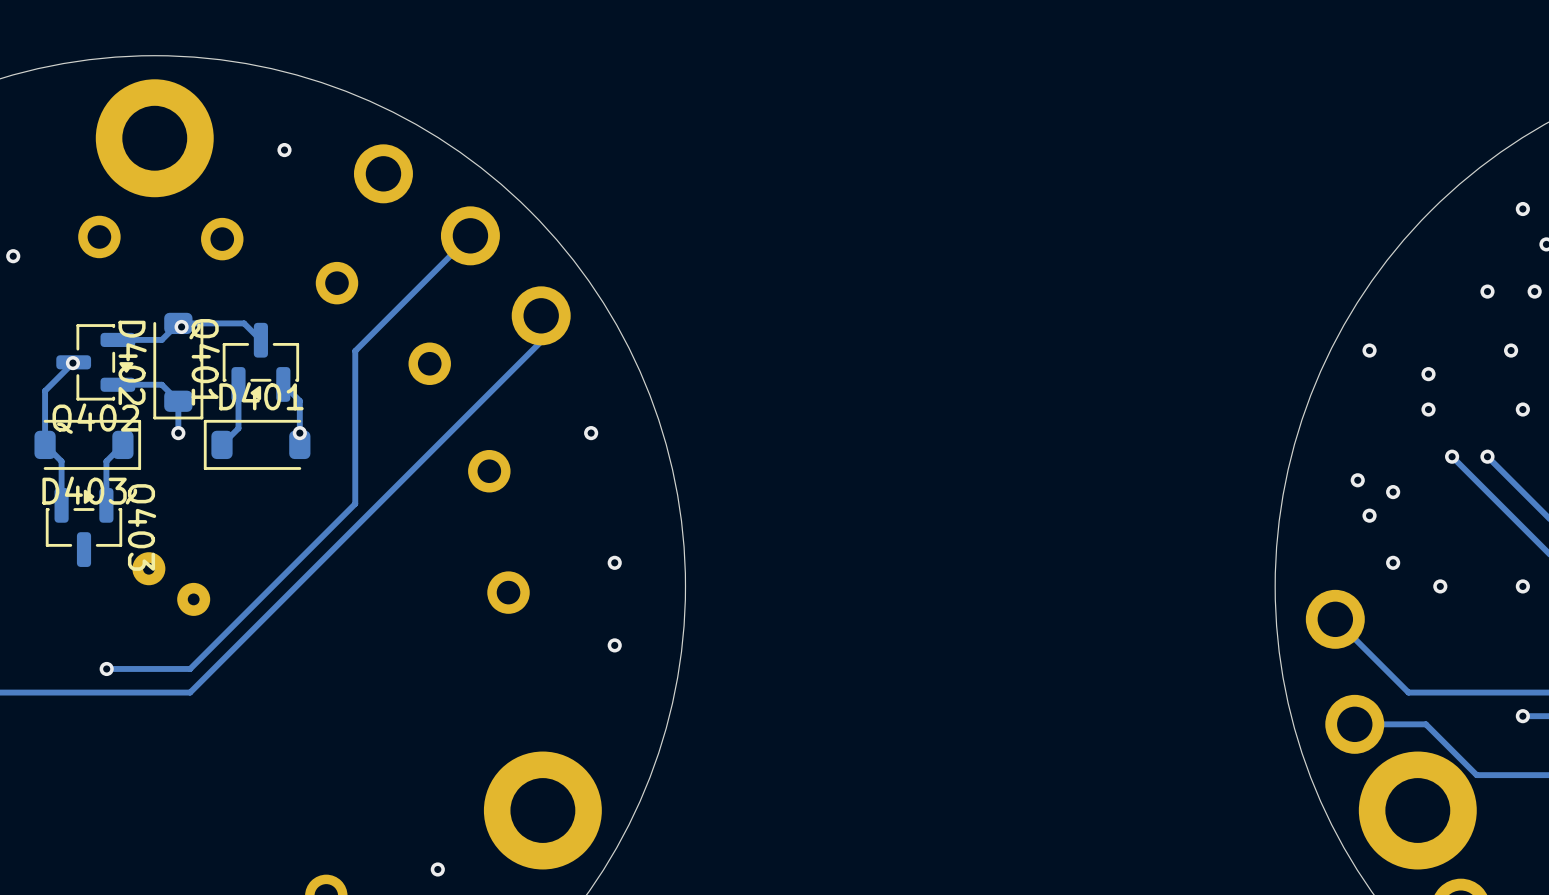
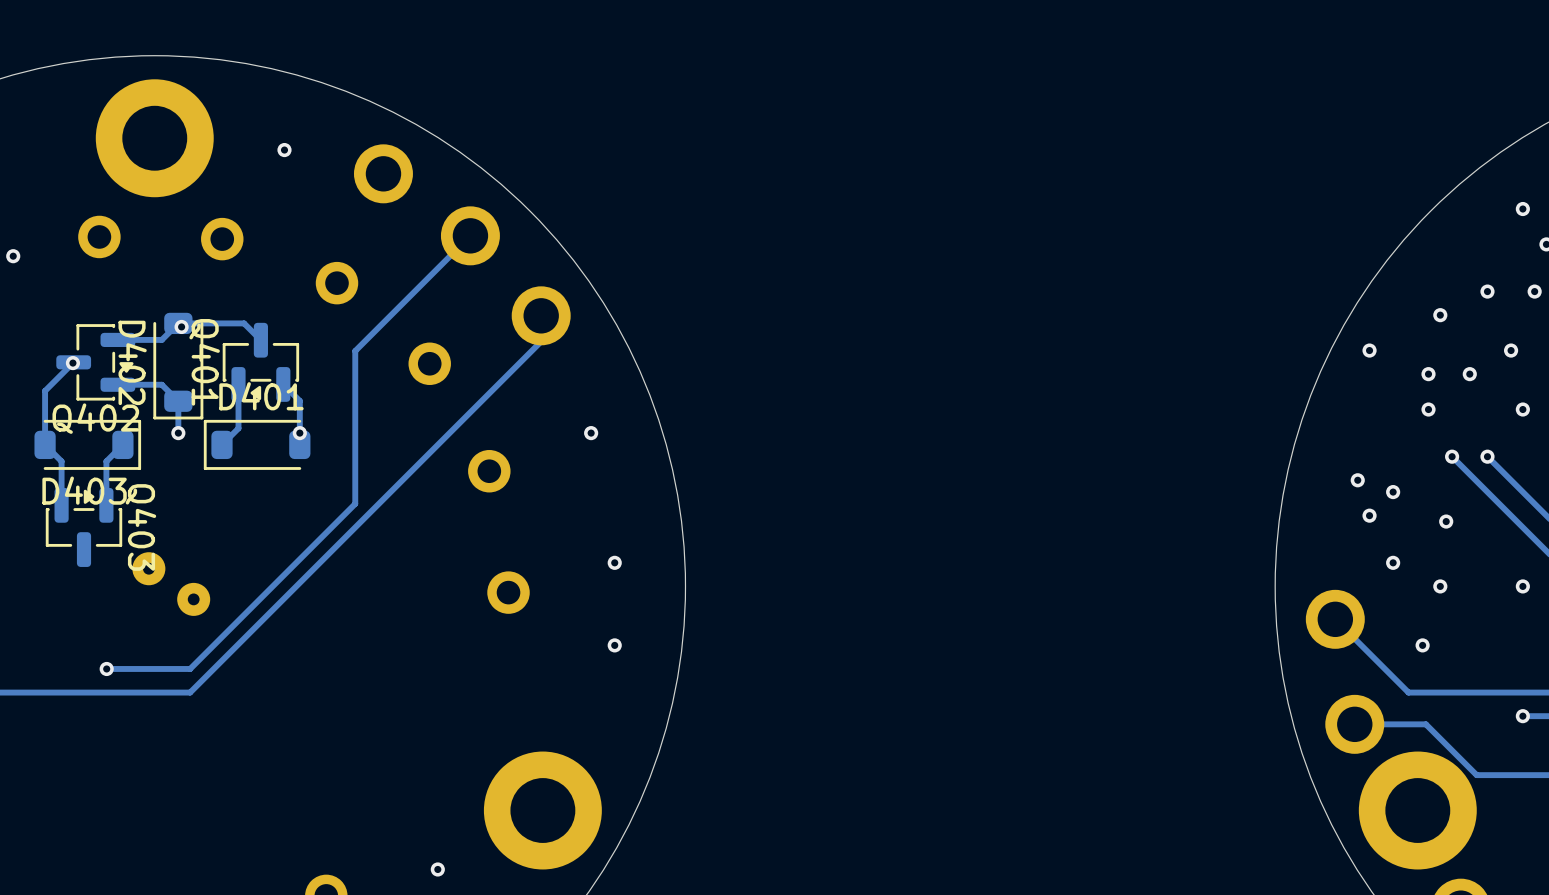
via: none -> (1440, 315)
via: none -> (1469, 374)
via: none -> (1446, 521)
via: none -> (1422, 645)

